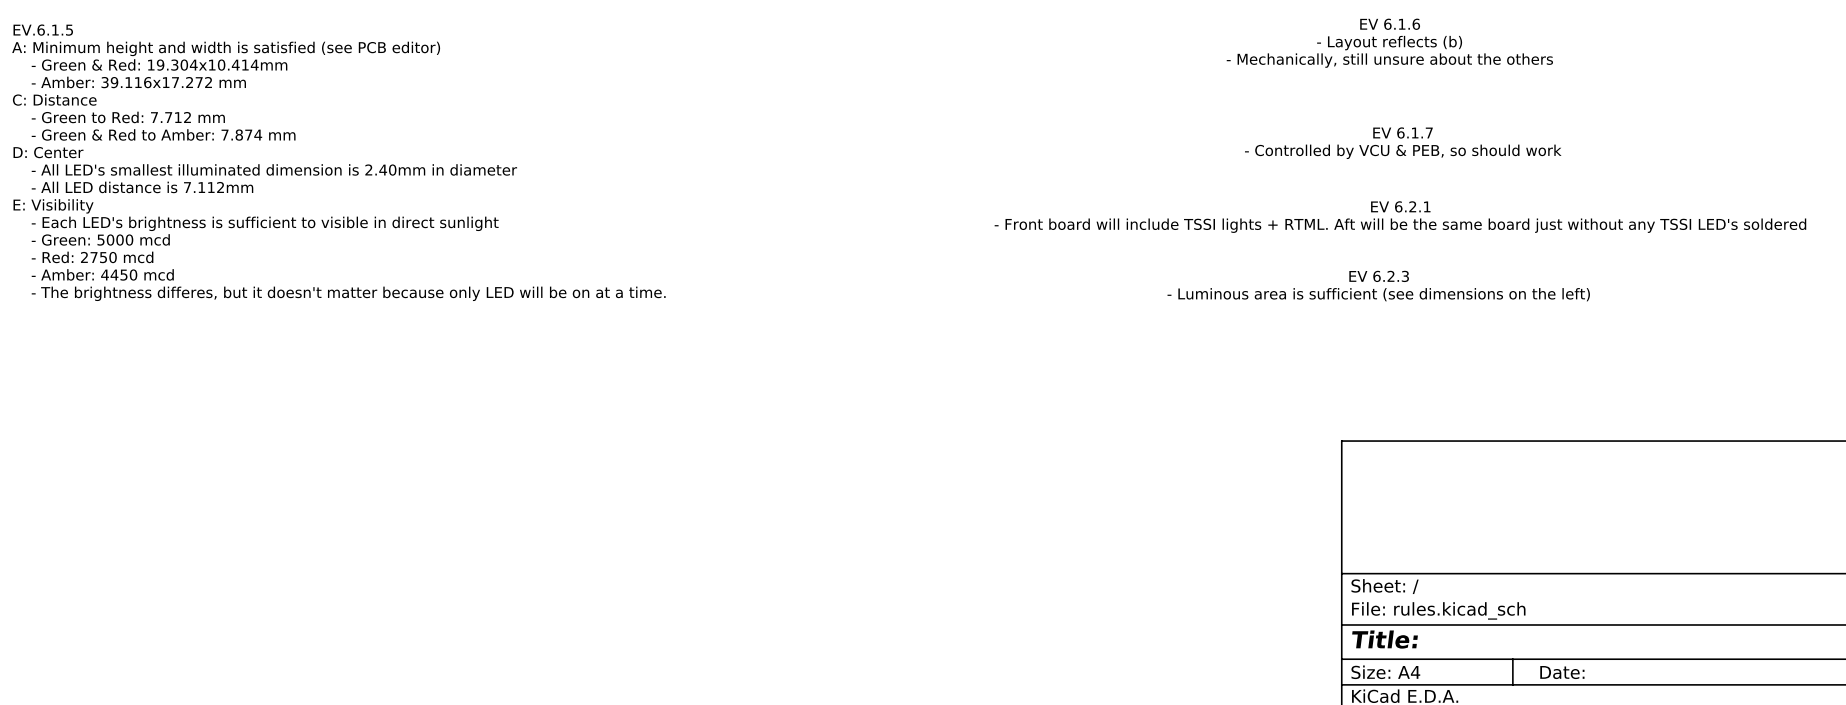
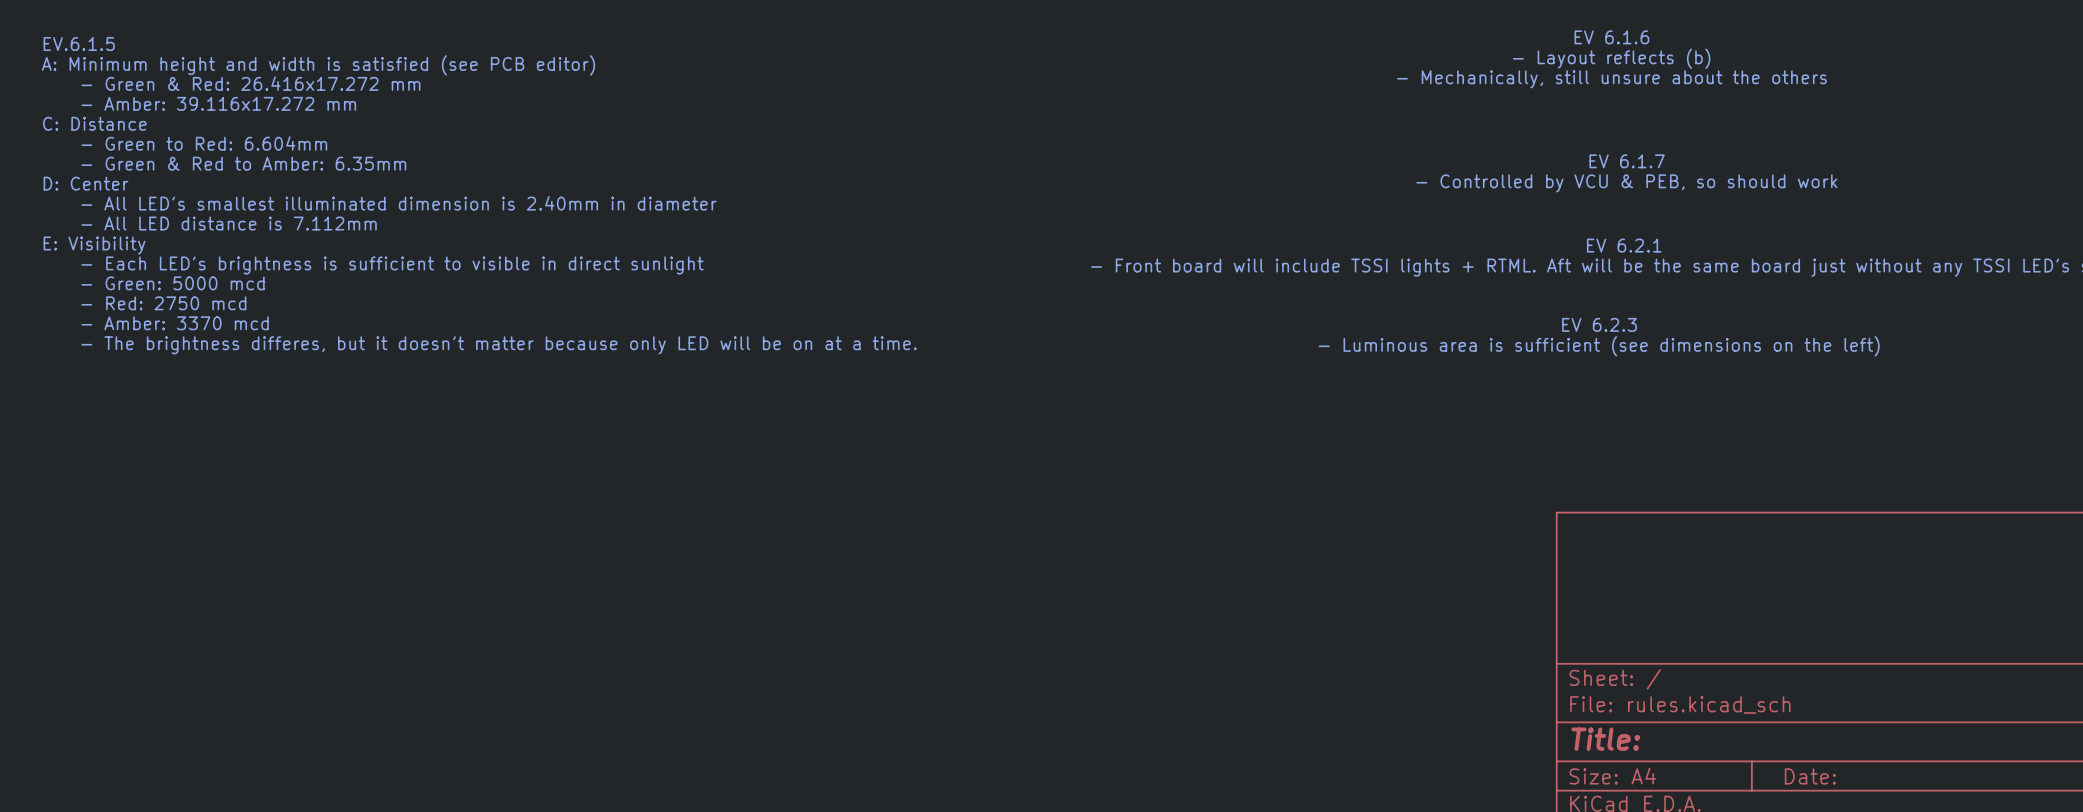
text: - Green & Red: 19.304x10.414mm (159, 64) -> - Green & Red: 26.416x17.272 mm (250, 83)
text: - Green to Red: 7.712 mm (128, 117) -> - Green to Red: 6.604mm (204, 143)
text: - Green & Red to Amber: 7.874 mm (163, 134) -> - Green & Red to Amber: 6.35mm (243, 163)
text: - Amber: 4450 mcd (102, 274) -> - Amber: 3370 mcd (175, 323)

